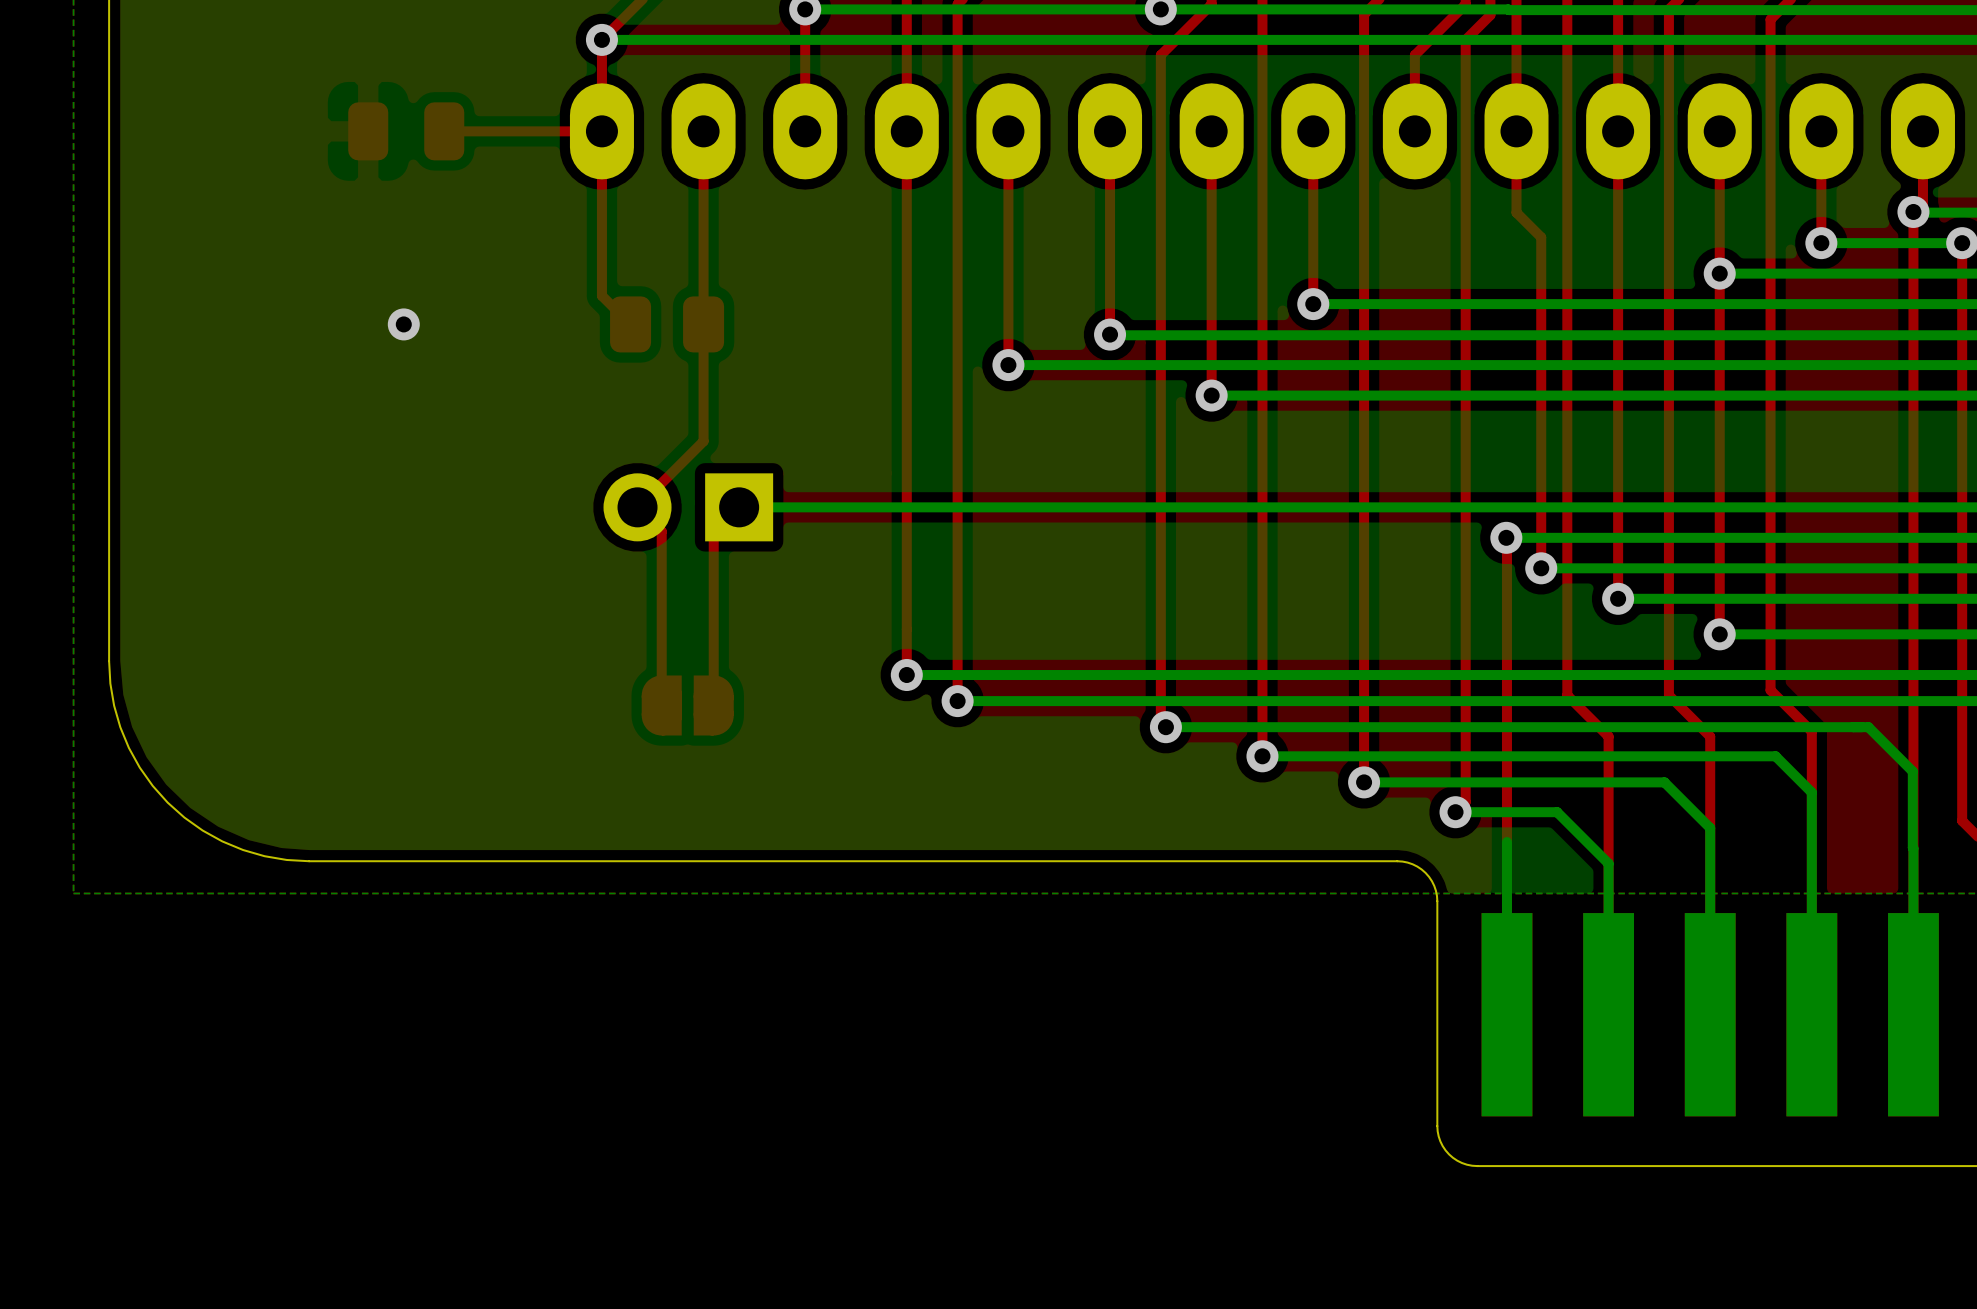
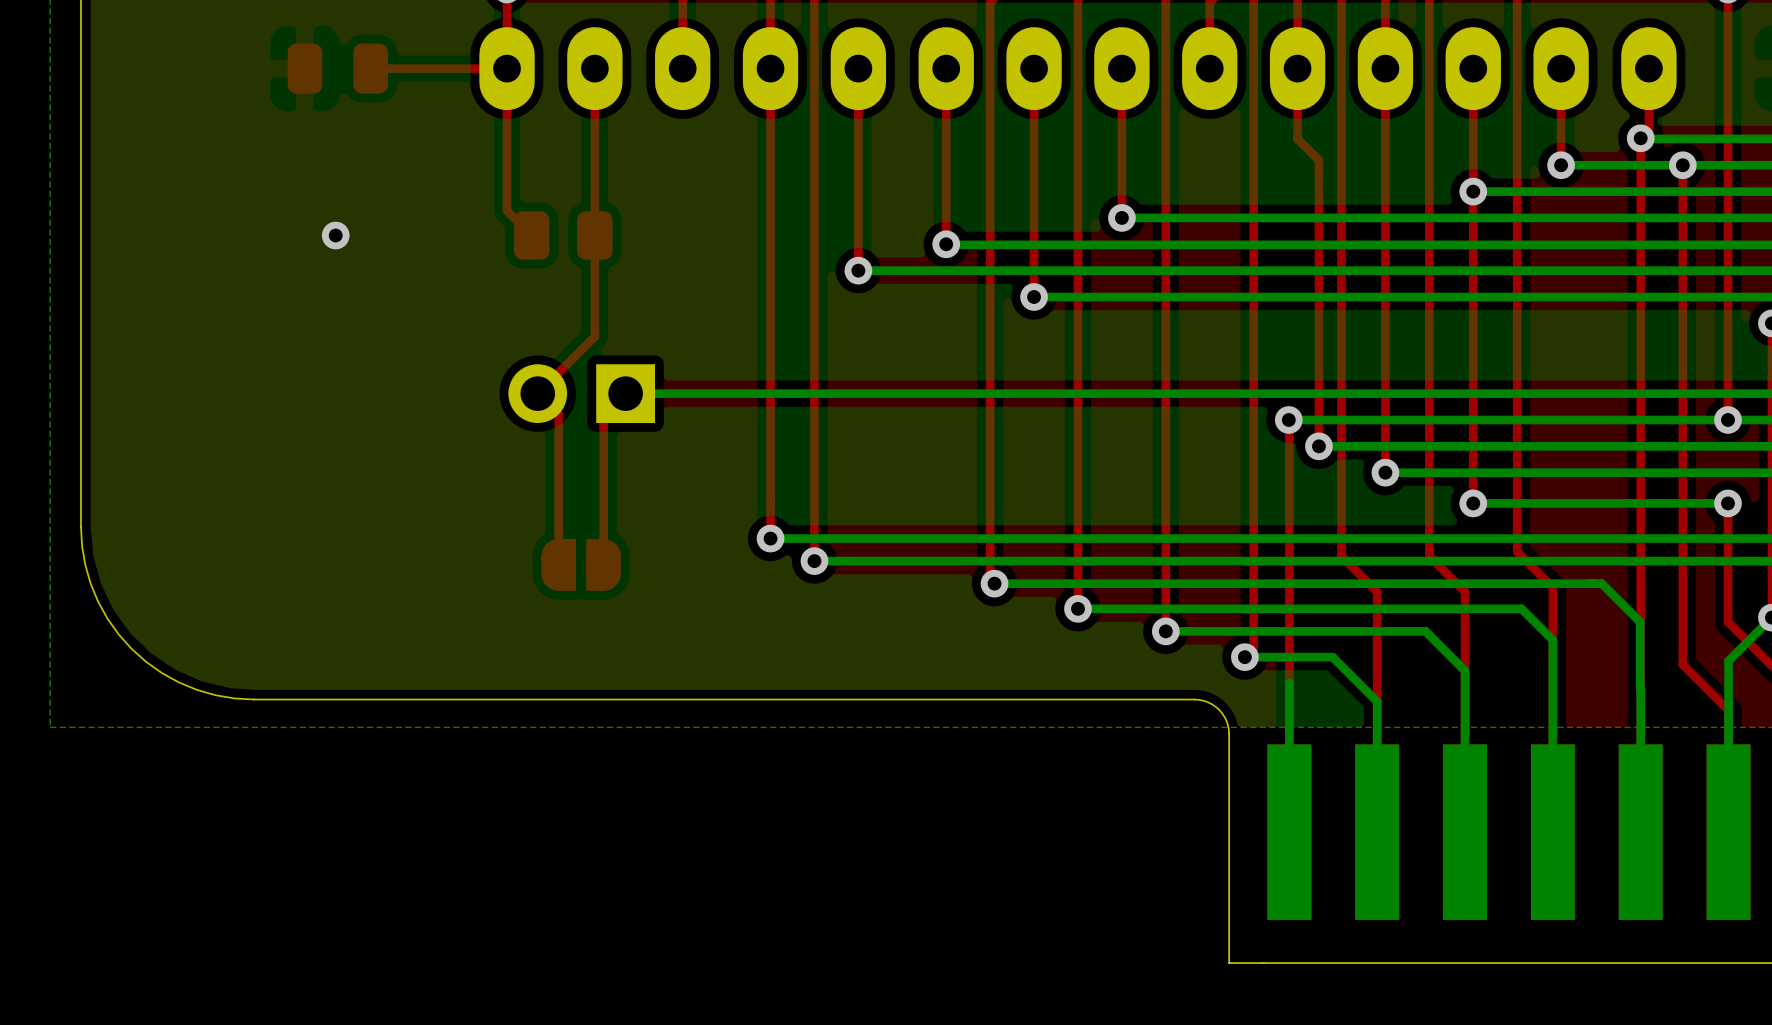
board edge: (1437, 1126) (1440, 1141) (1449, 1154) (1462, 1163) (1477, 1166) -> (1229, 928) (1229, 963) (1263, 963)

